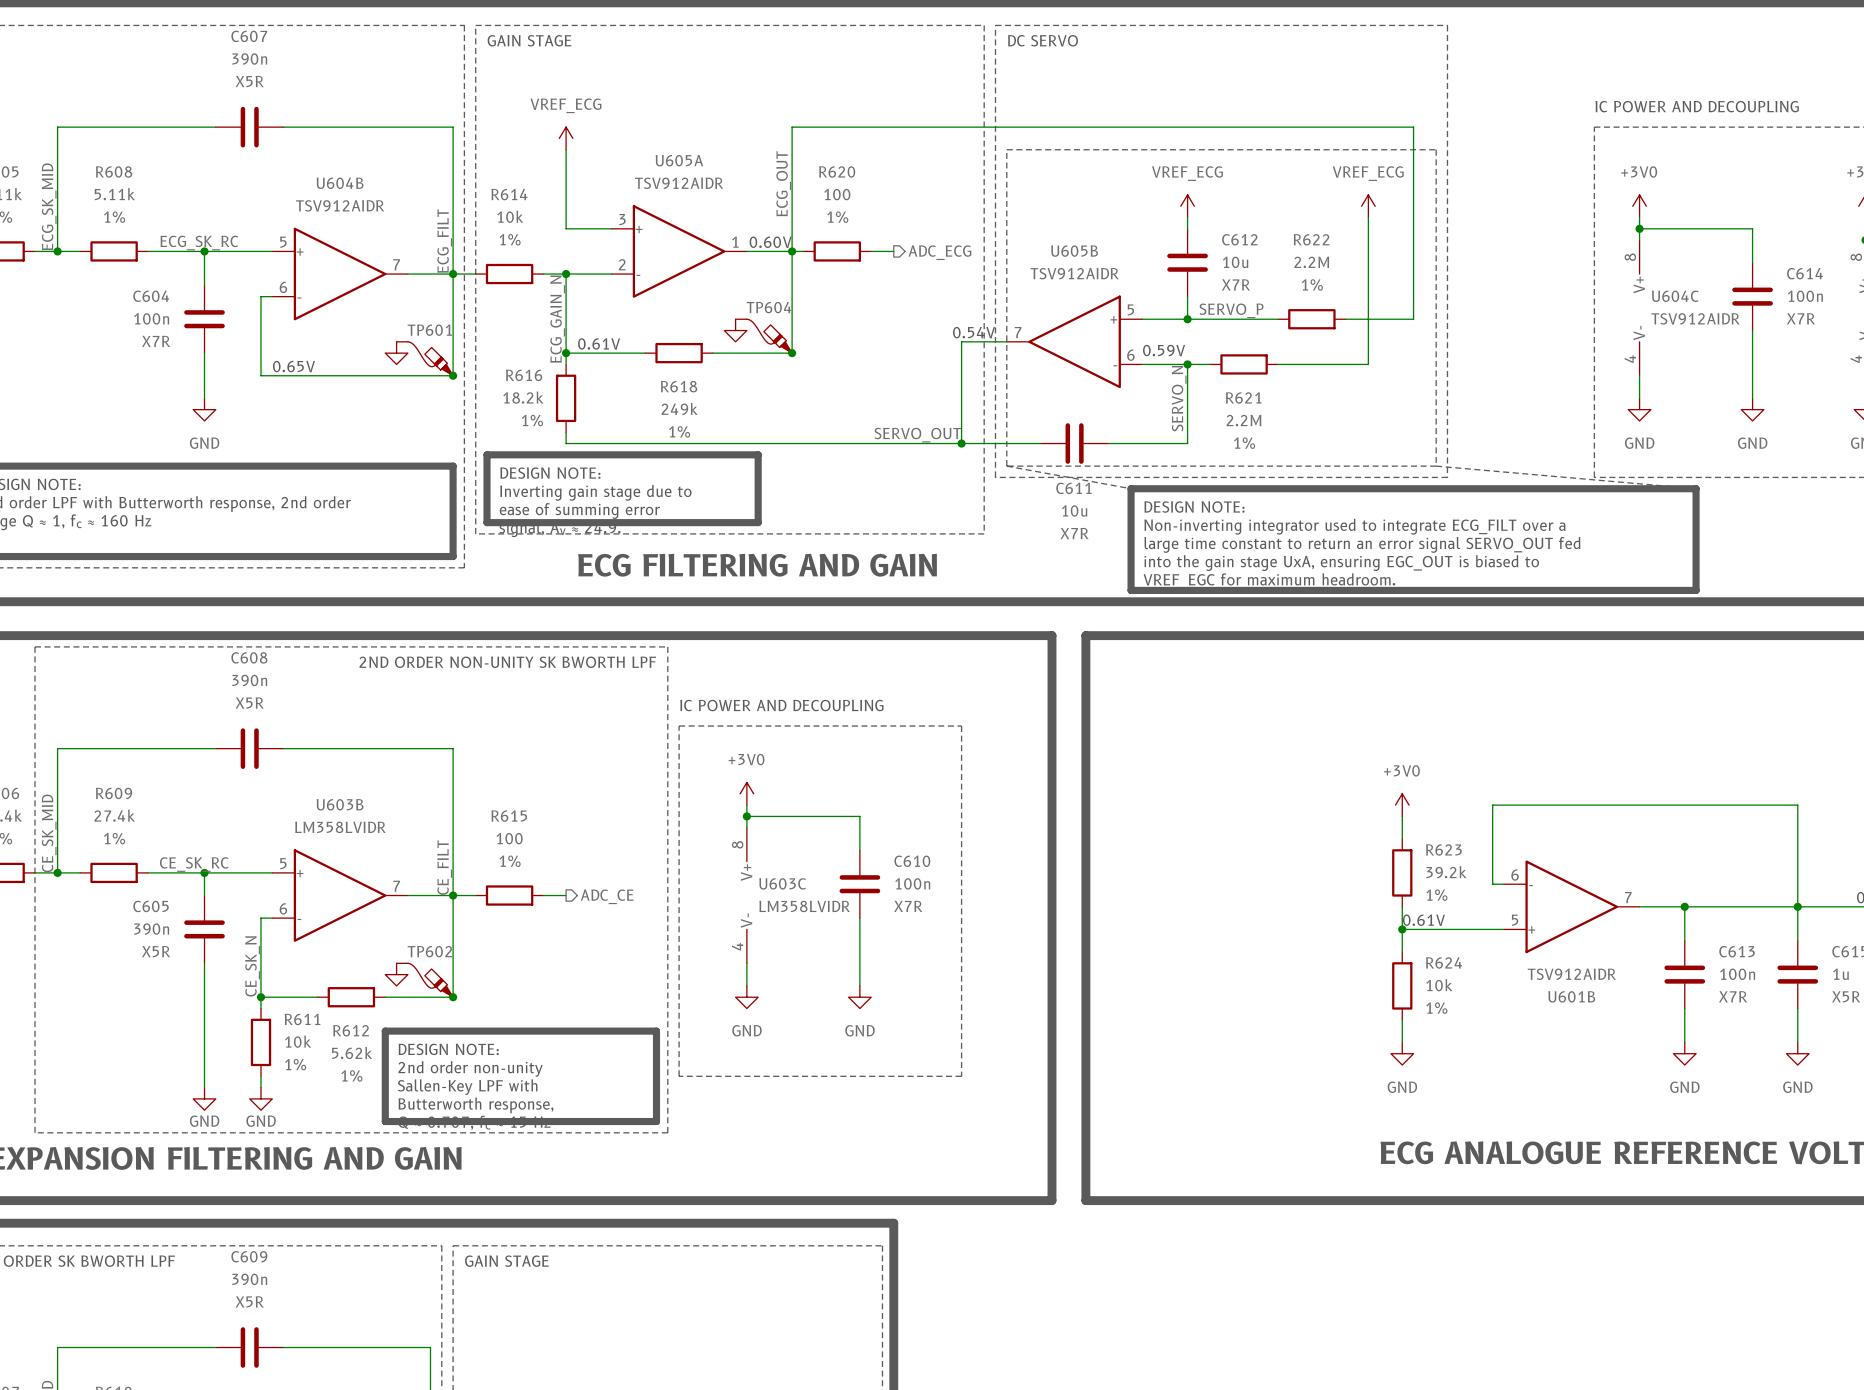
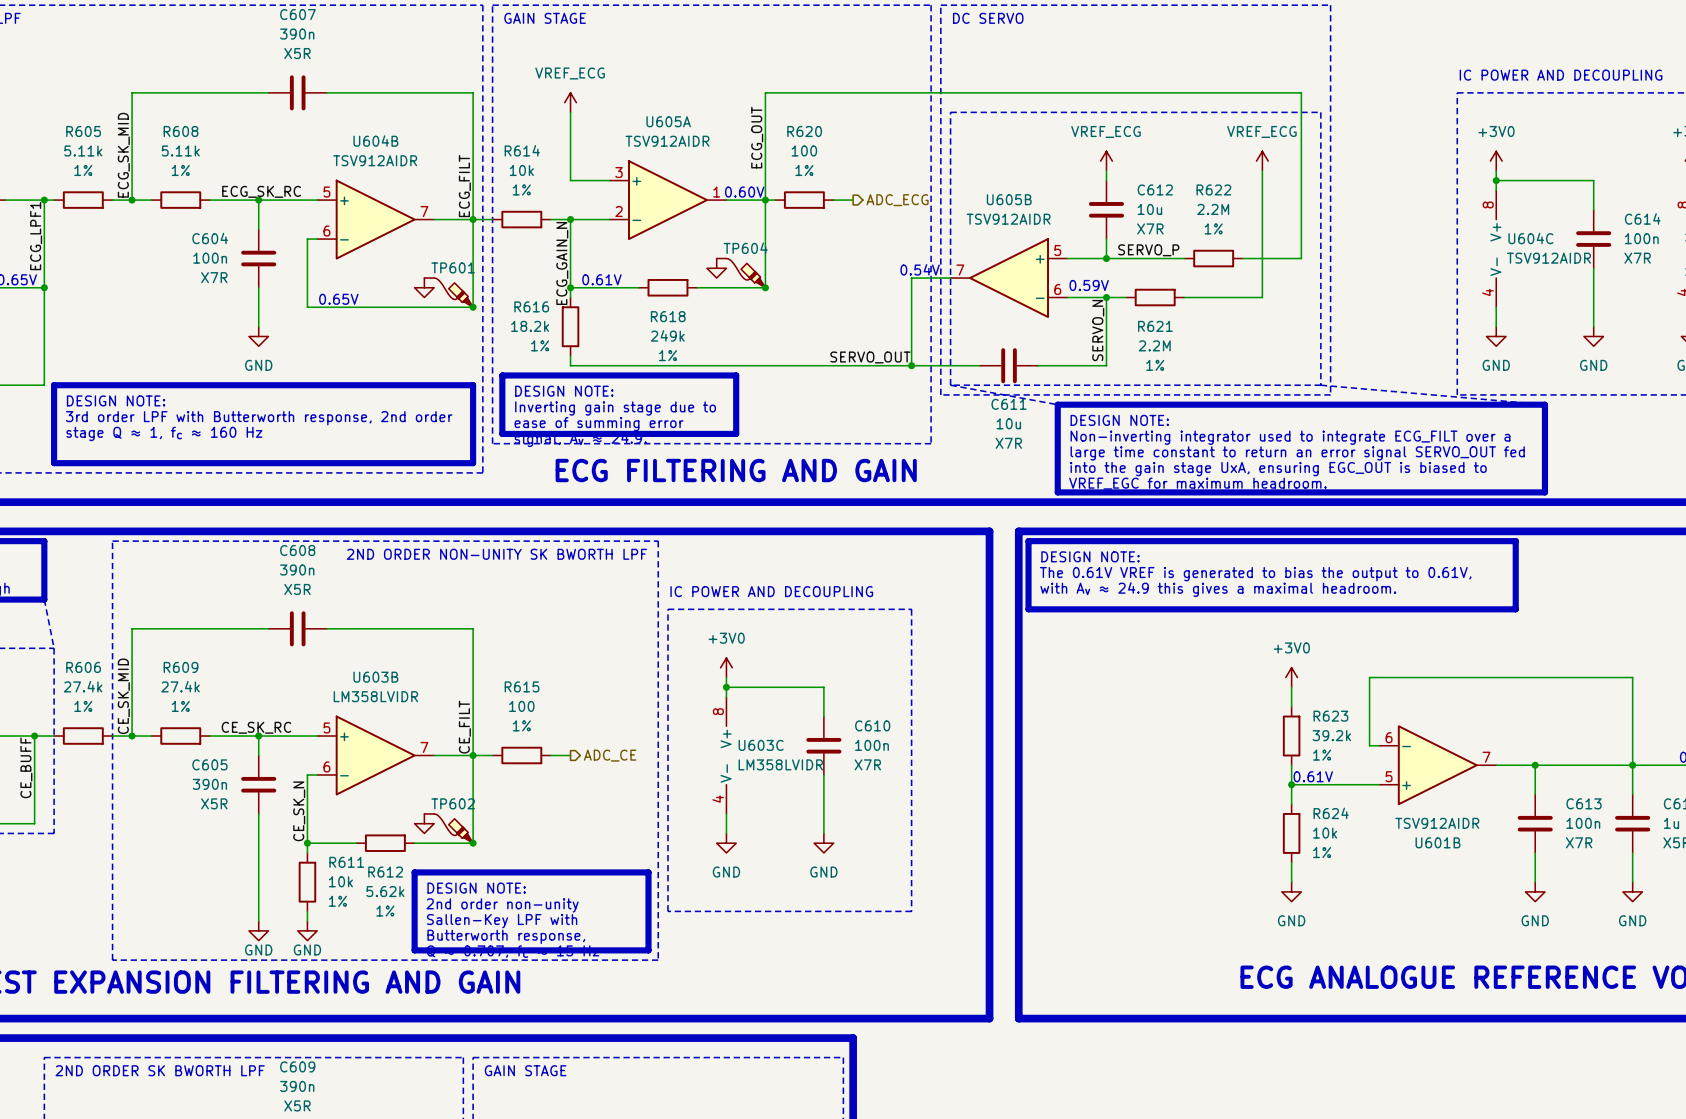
line: none -> (1028, 541) (1515, 541) (1515, 609) (1028, 609) (1028, 541)
text: none -> DESIGN NOTE: (1090, 556)
text: none -> The 0.61V VREF is generated to bias the output to 0.61V, (1255, 574)
text: none -> with Av ≈ 24.9 this gives a maximal headroom. (1218, 589)

